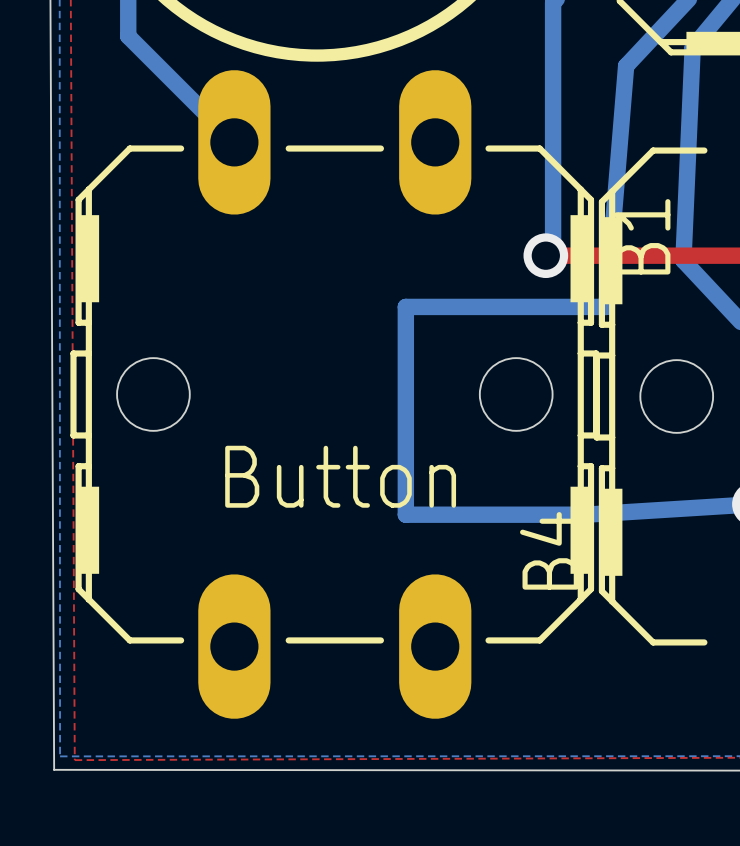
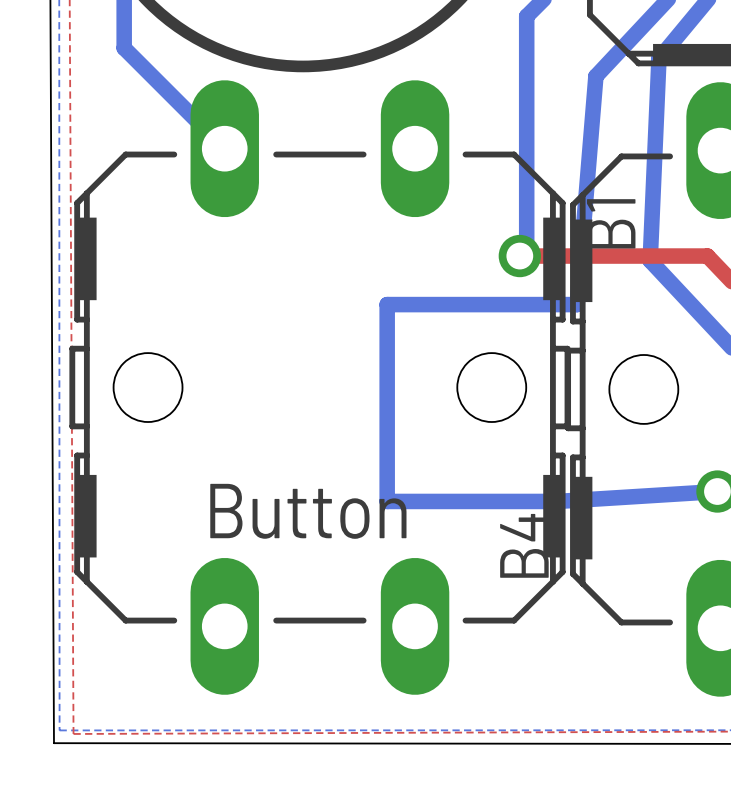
text position: Button (340, 476) -> Button (308, 511)

